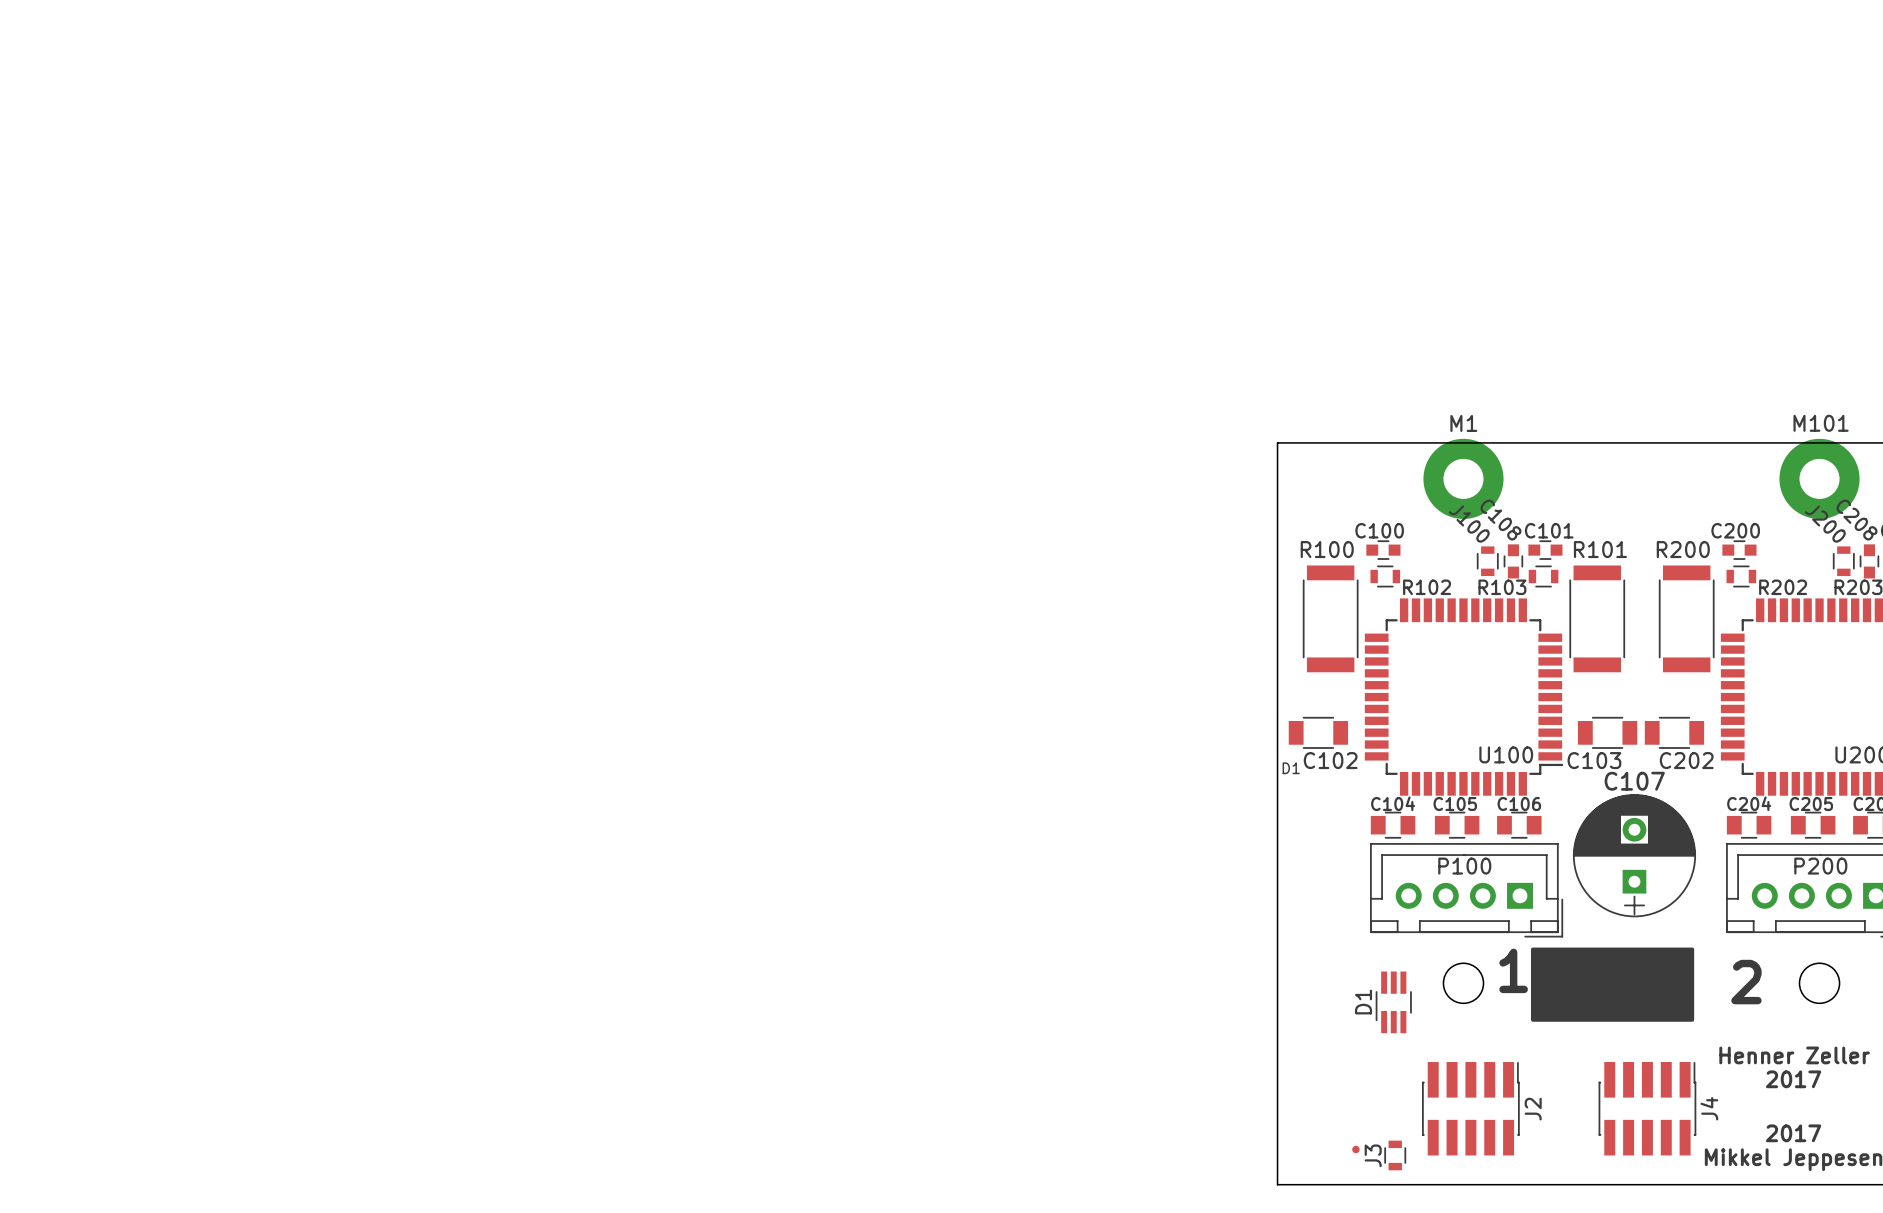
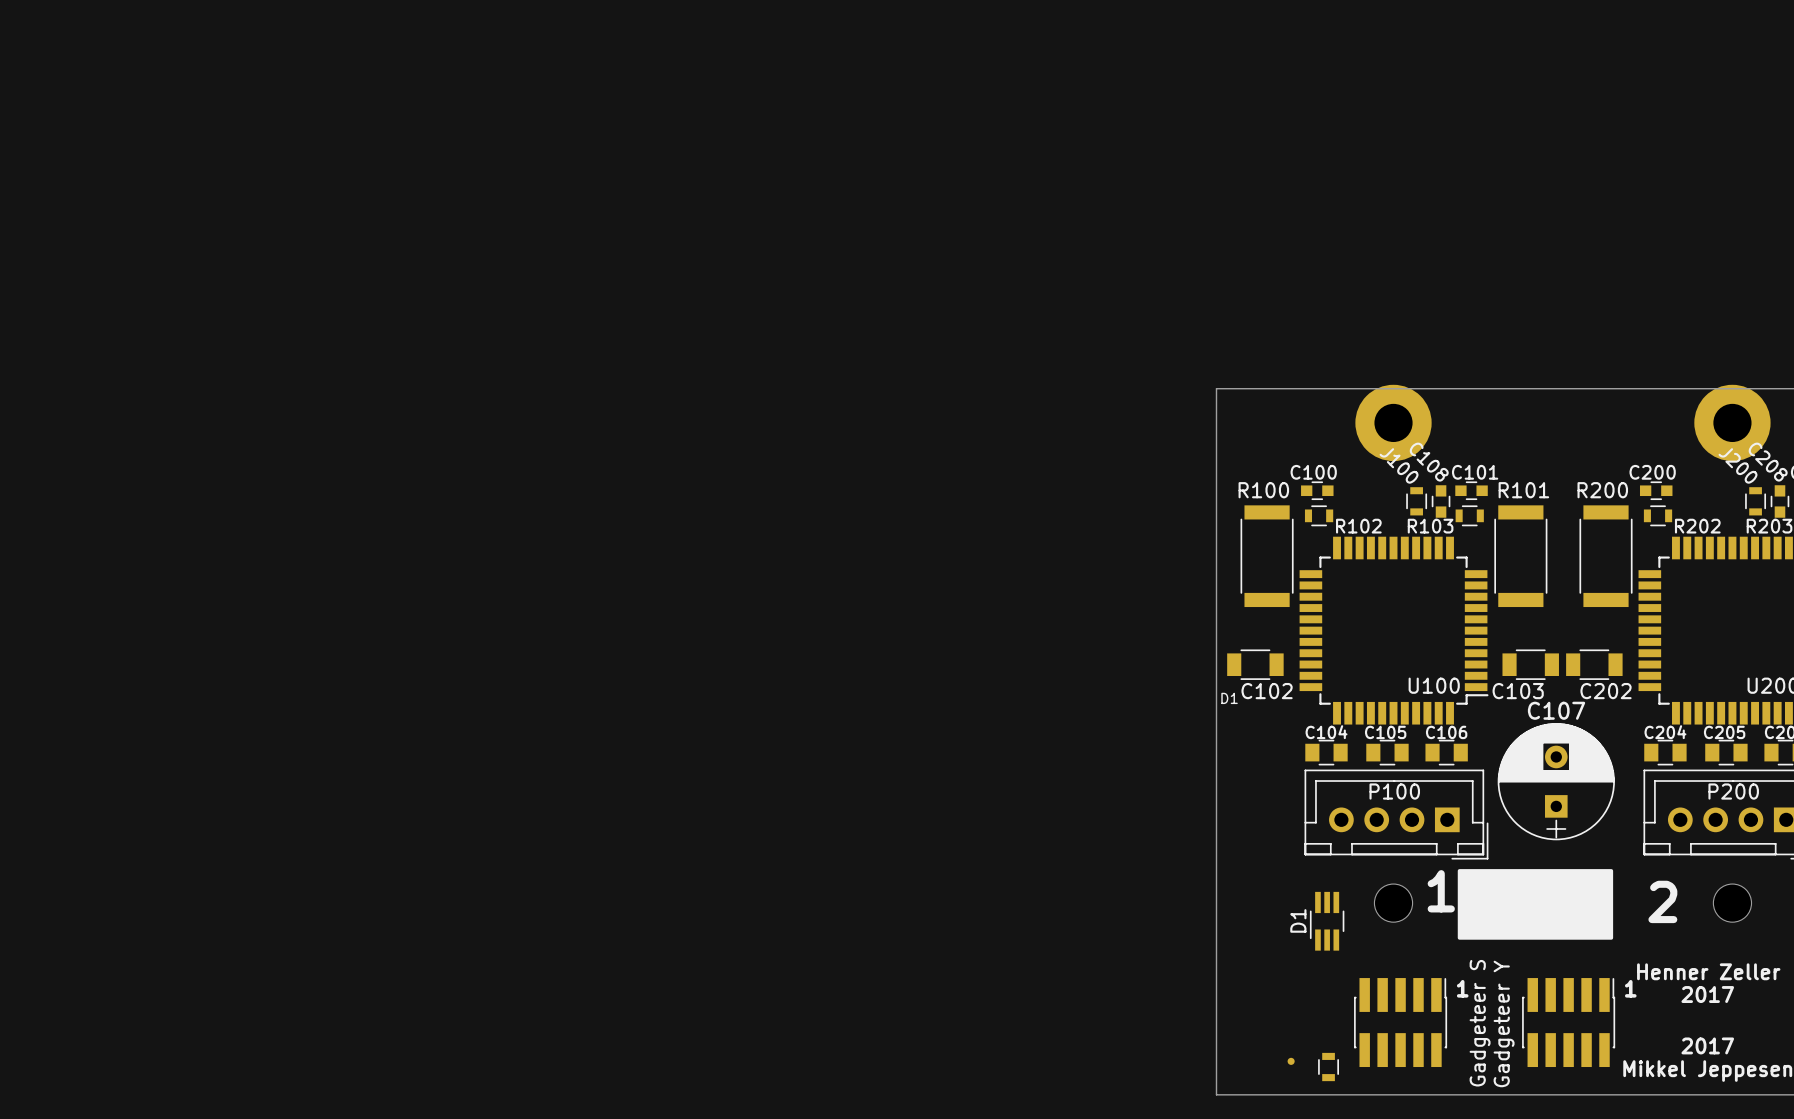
M1 name: M1 (1463, 423) -> none
M101 name: M101 (1821, 423) -> none
text: none -> 1 (1462, 988)
text: none -> 1 (1630, 988)
J4 name: J4 (1709, 1108) -> none
J2 name: J2 (1533, 1109) -> none
J2 value: none -> Gadgeteer S (1480, 1023)
J4 value: none -> Gadgeteer Y (1504, 1023)
J3 name: J3 (1373, 1155) -> none

